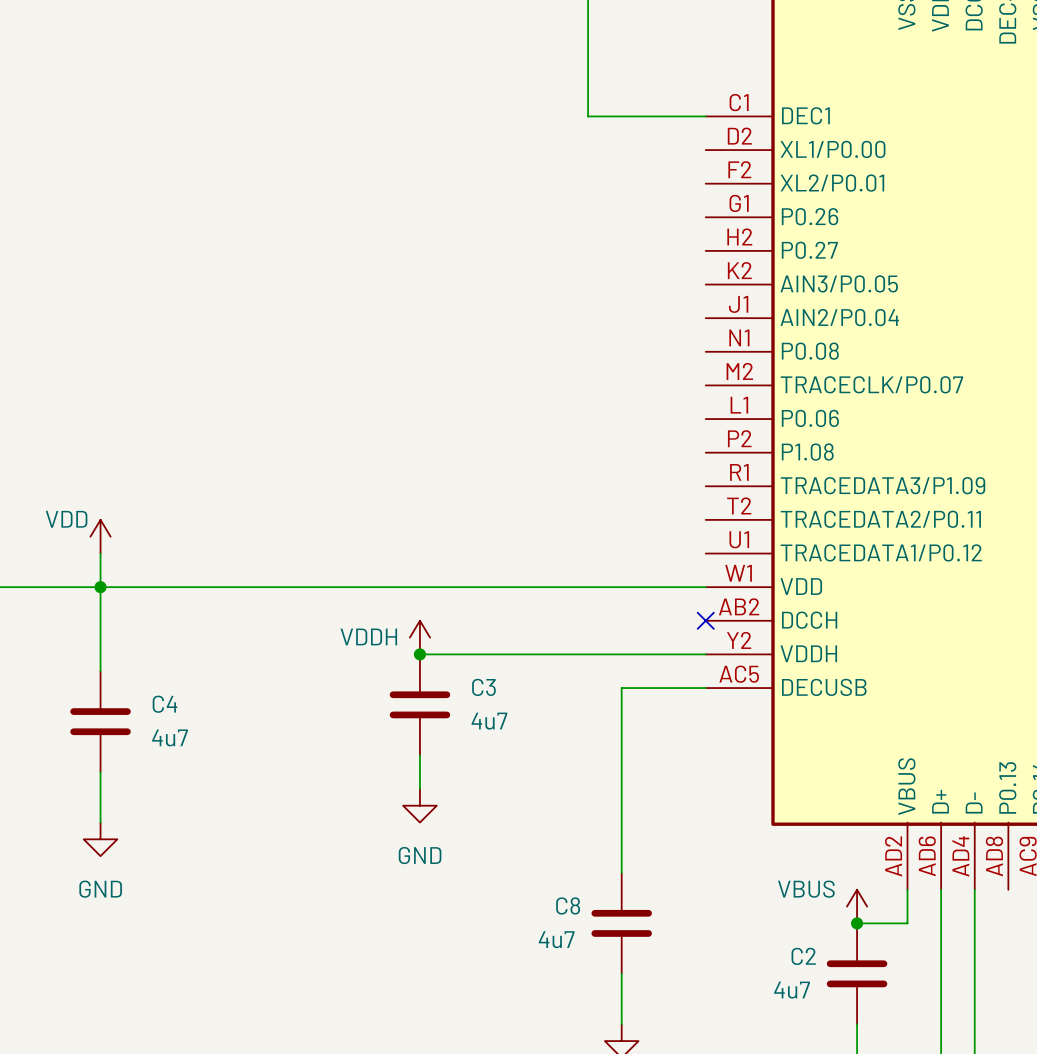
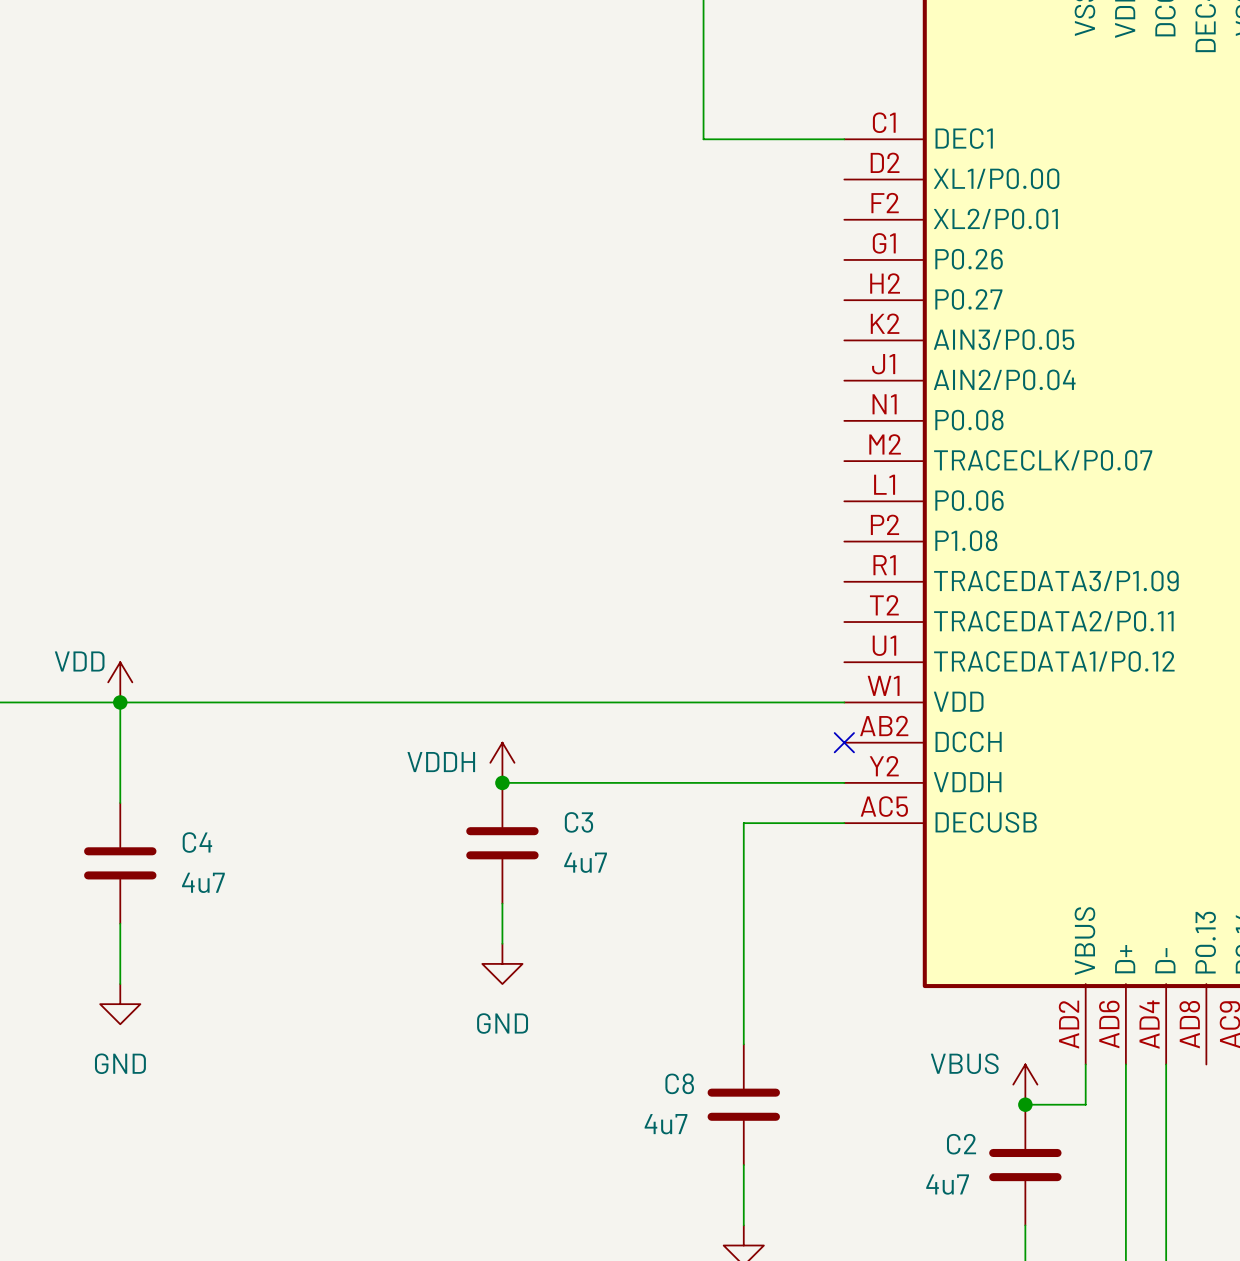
power symbol position: VDD (100, 536) -> VDD (120, 682)

